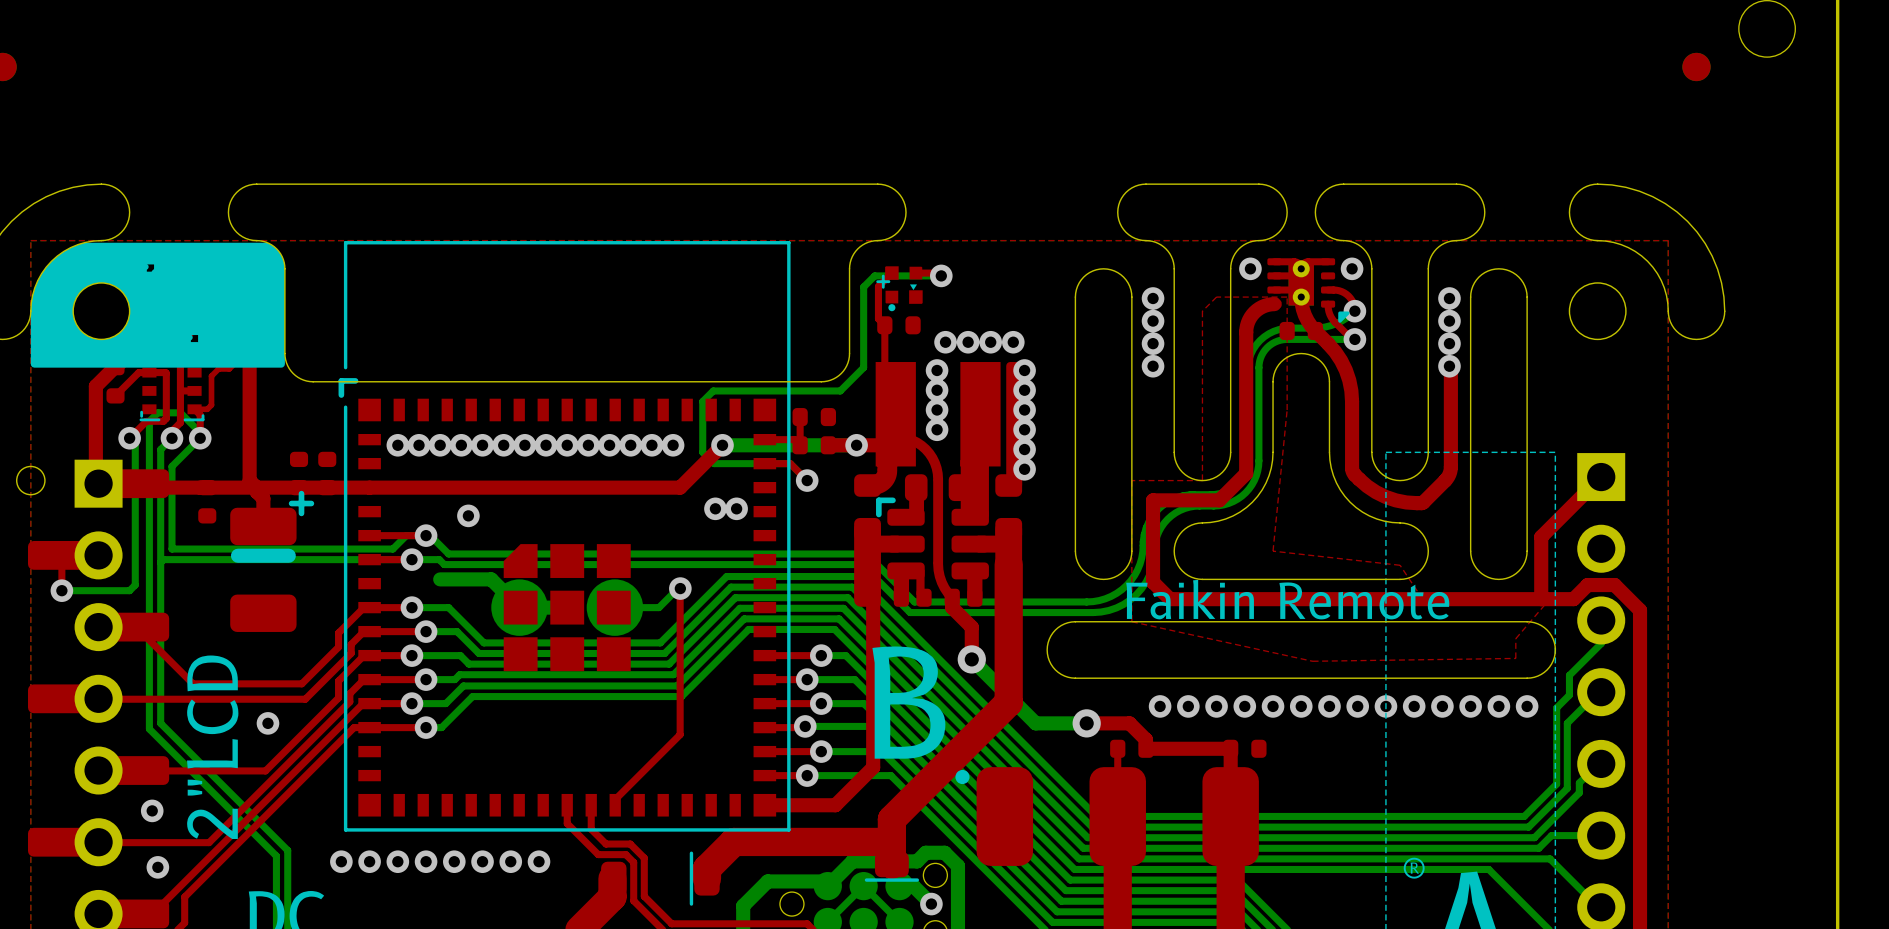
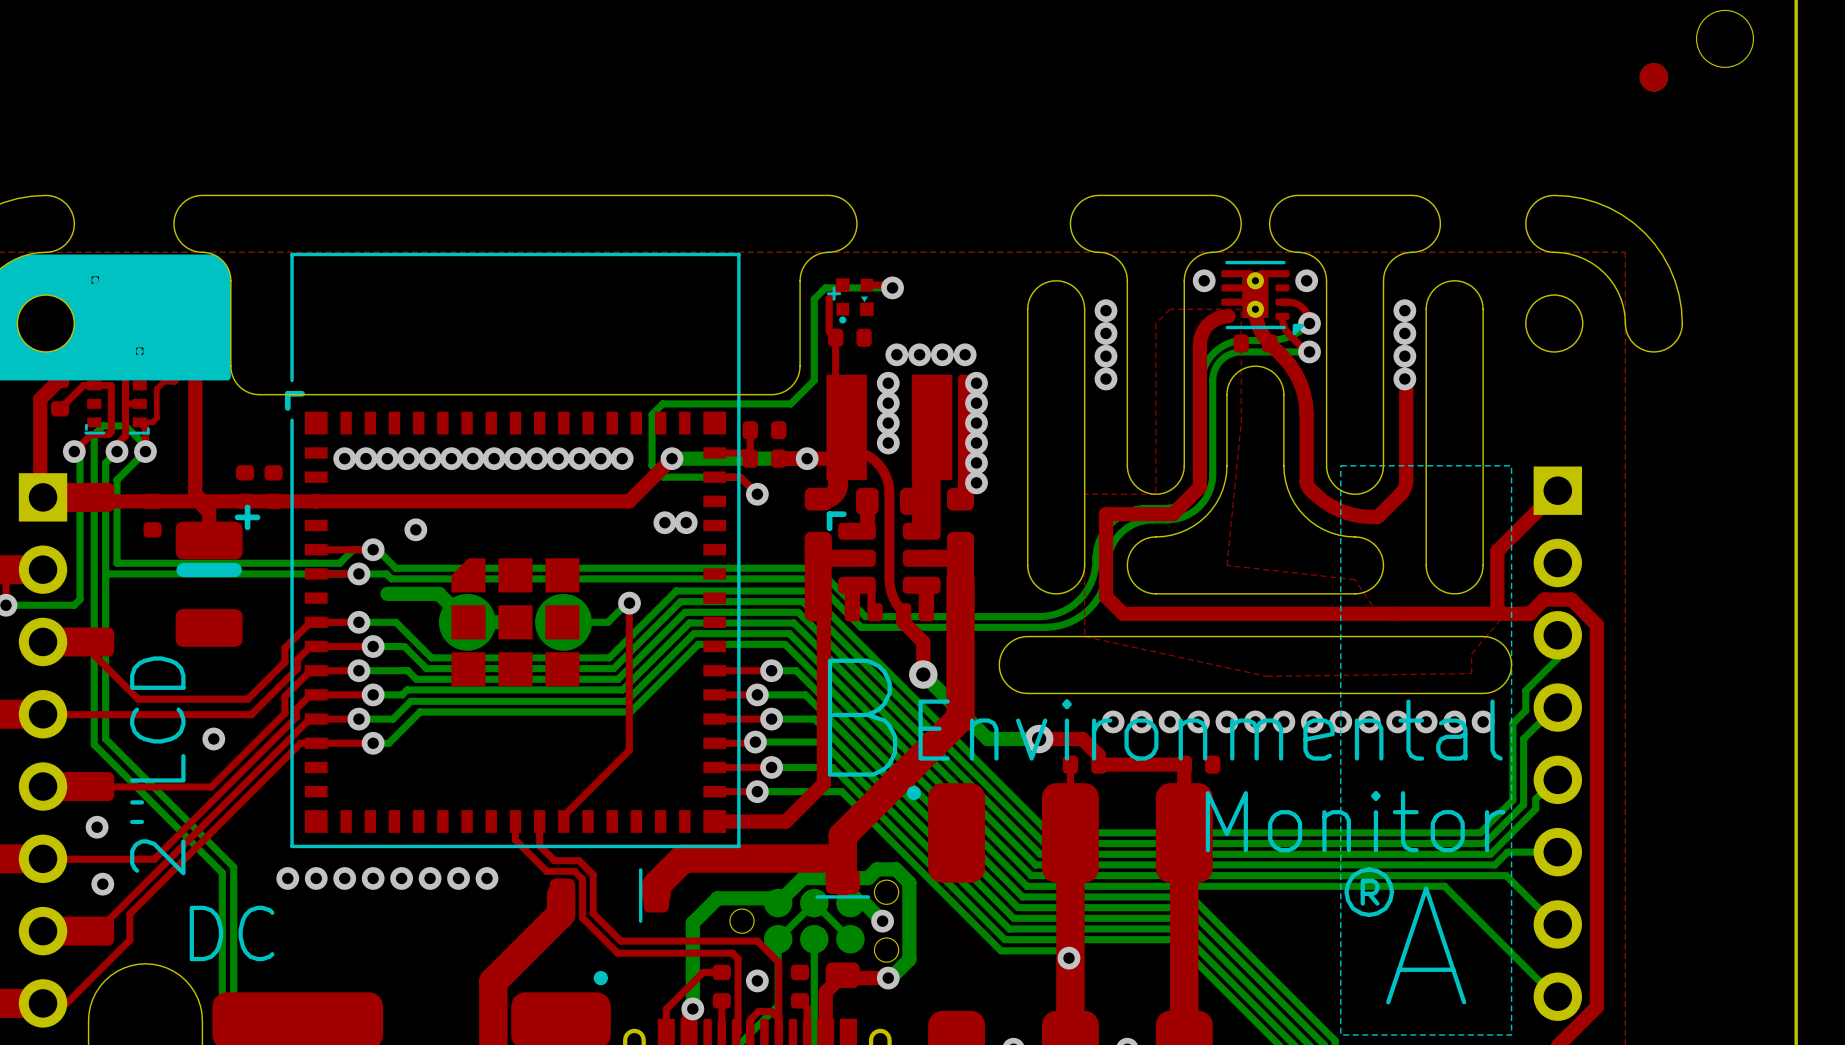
part footprint: [1267, 258, 1350, 323] -> [1221, 260, 1305, 336]
text: Faikin Remote (1287, 599) -> none
text: none -> Environmental (1210, 730)
text: none -> Monitor (1355, 821)

